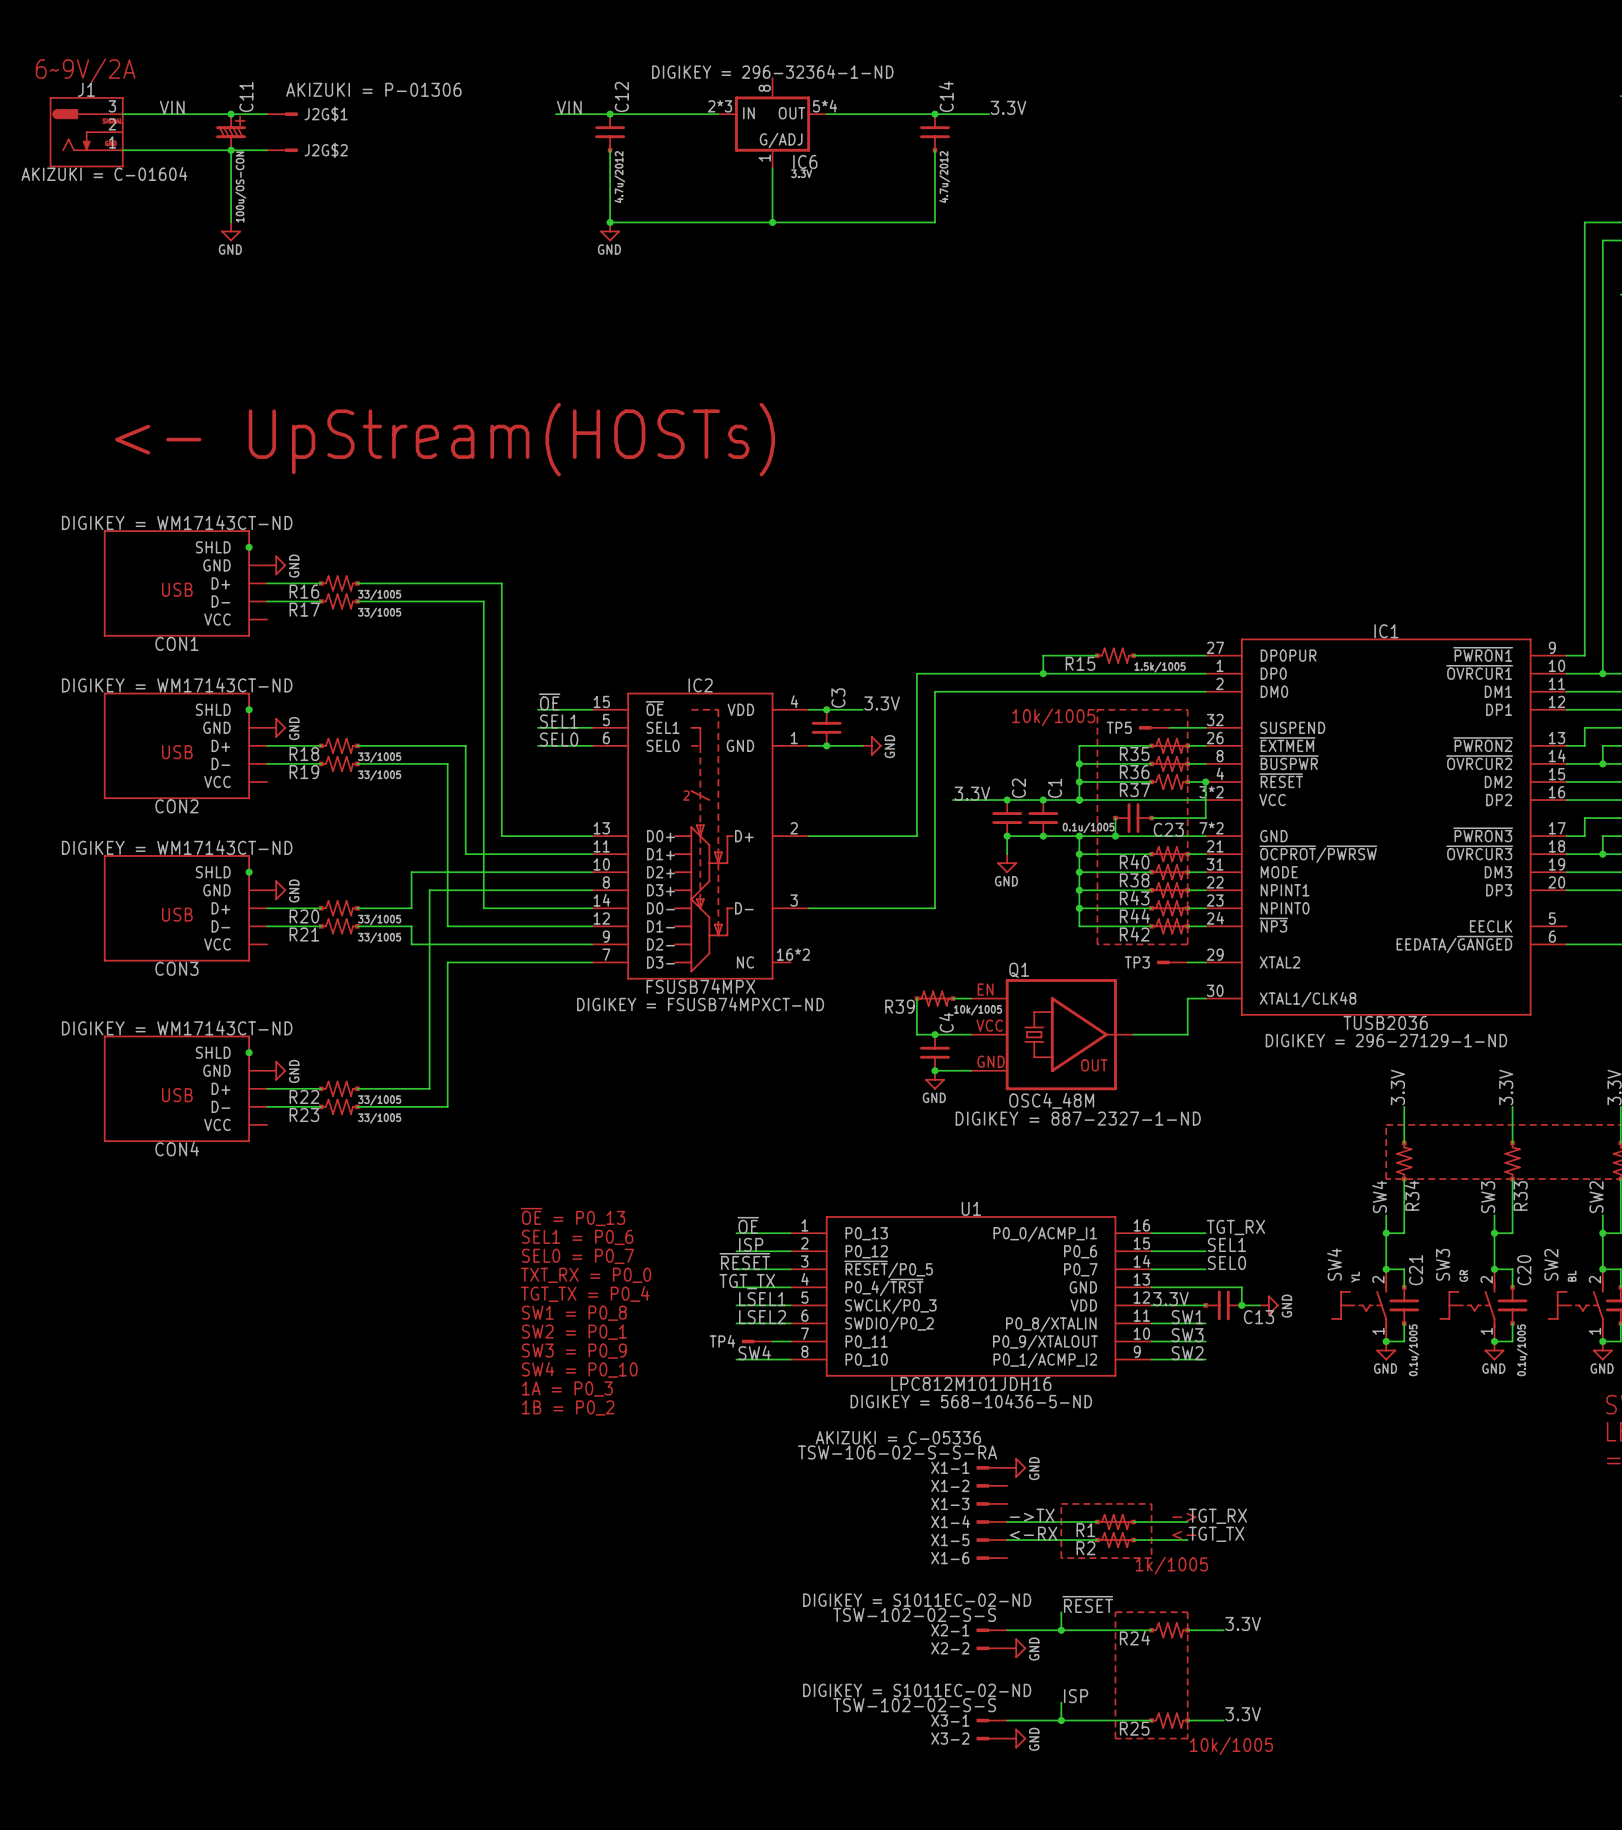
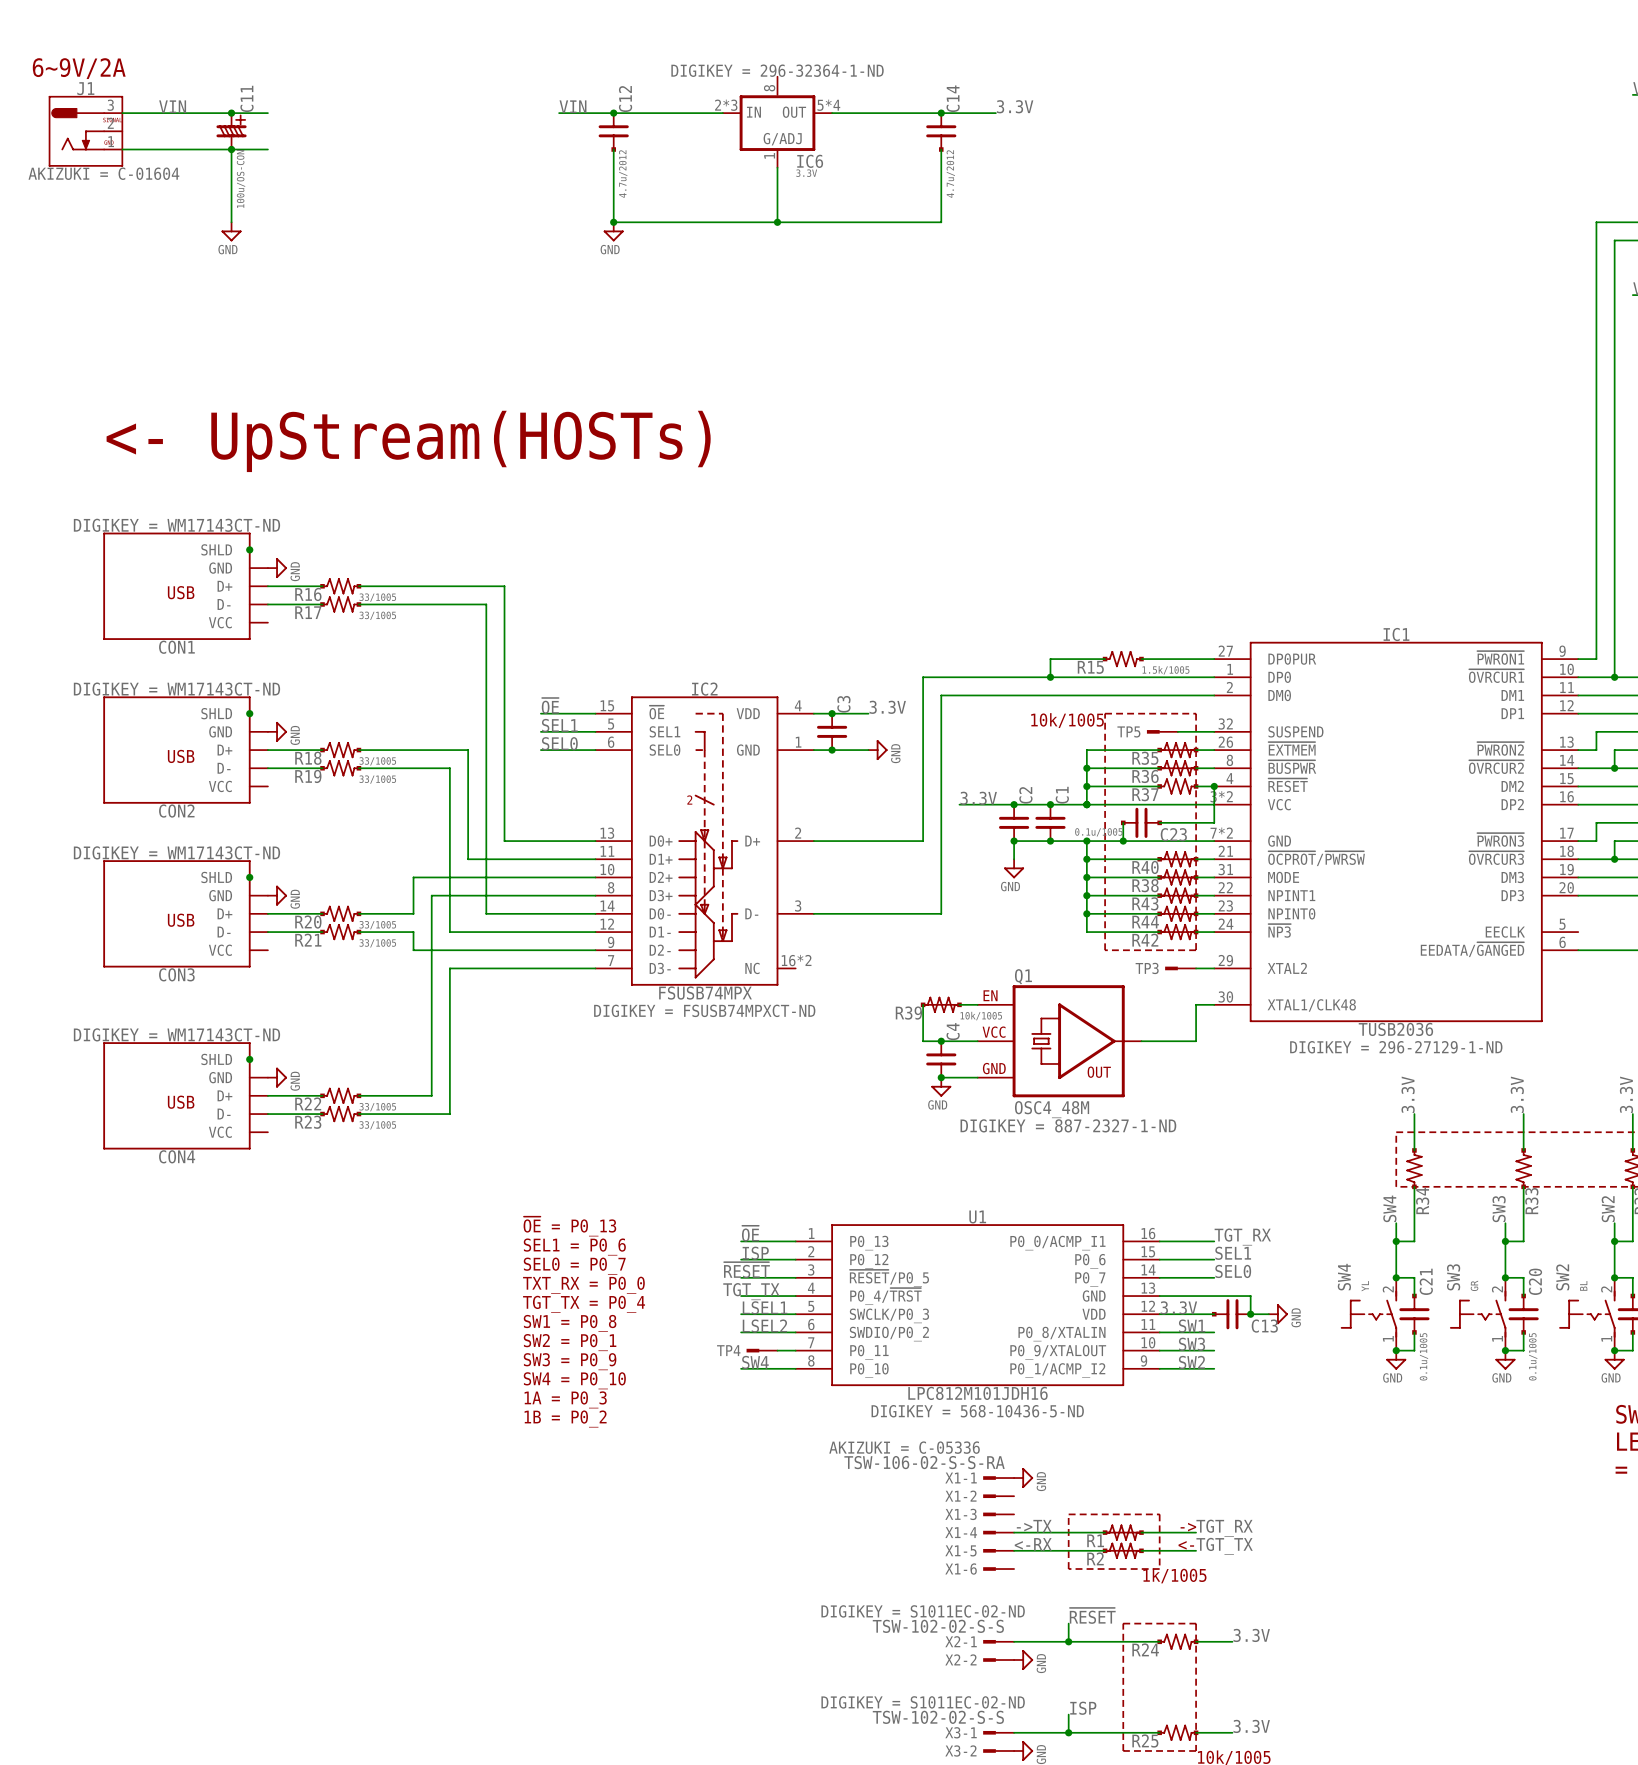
J2G$1: (282, 114) -> none
J2G$2: (282, 150) -> none

